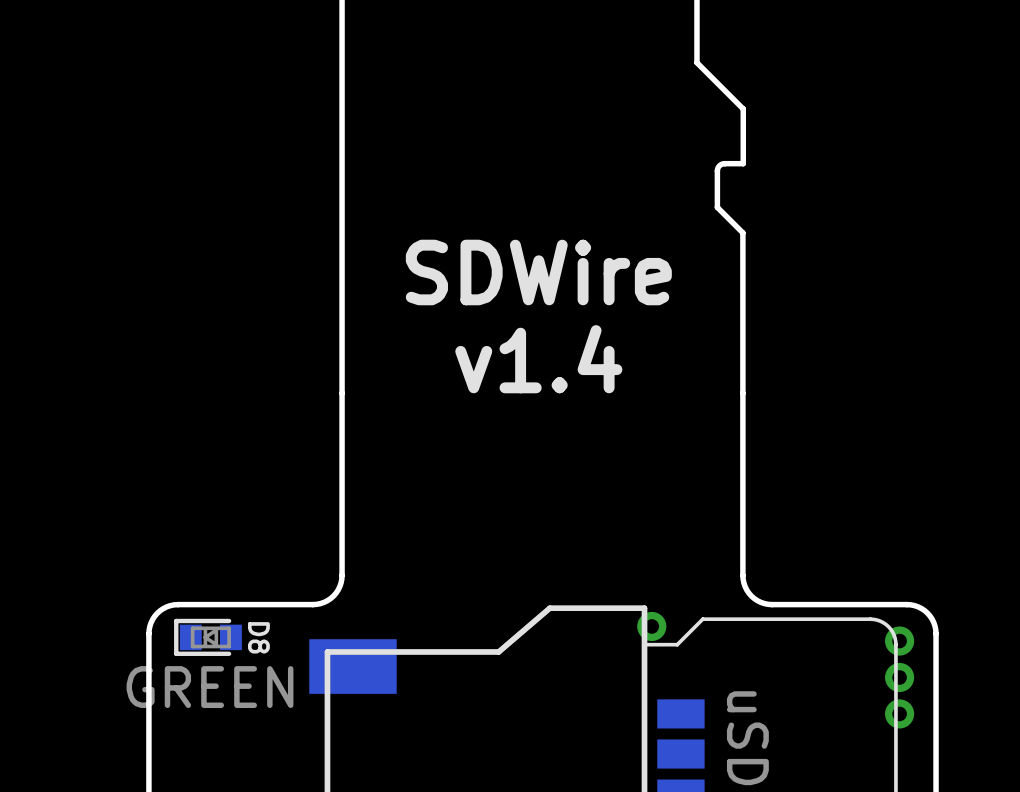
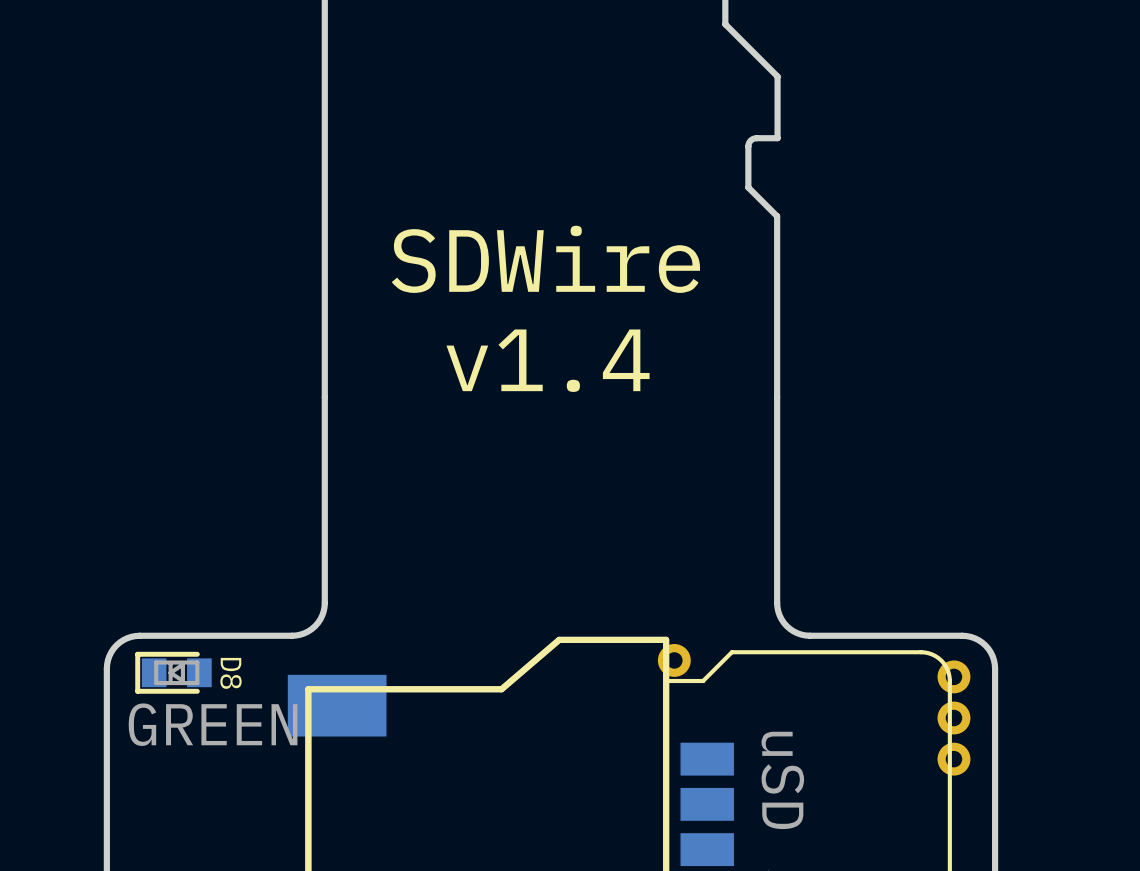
D8 value position: GREEN (210, 687) -> GREEN (213, 724)

